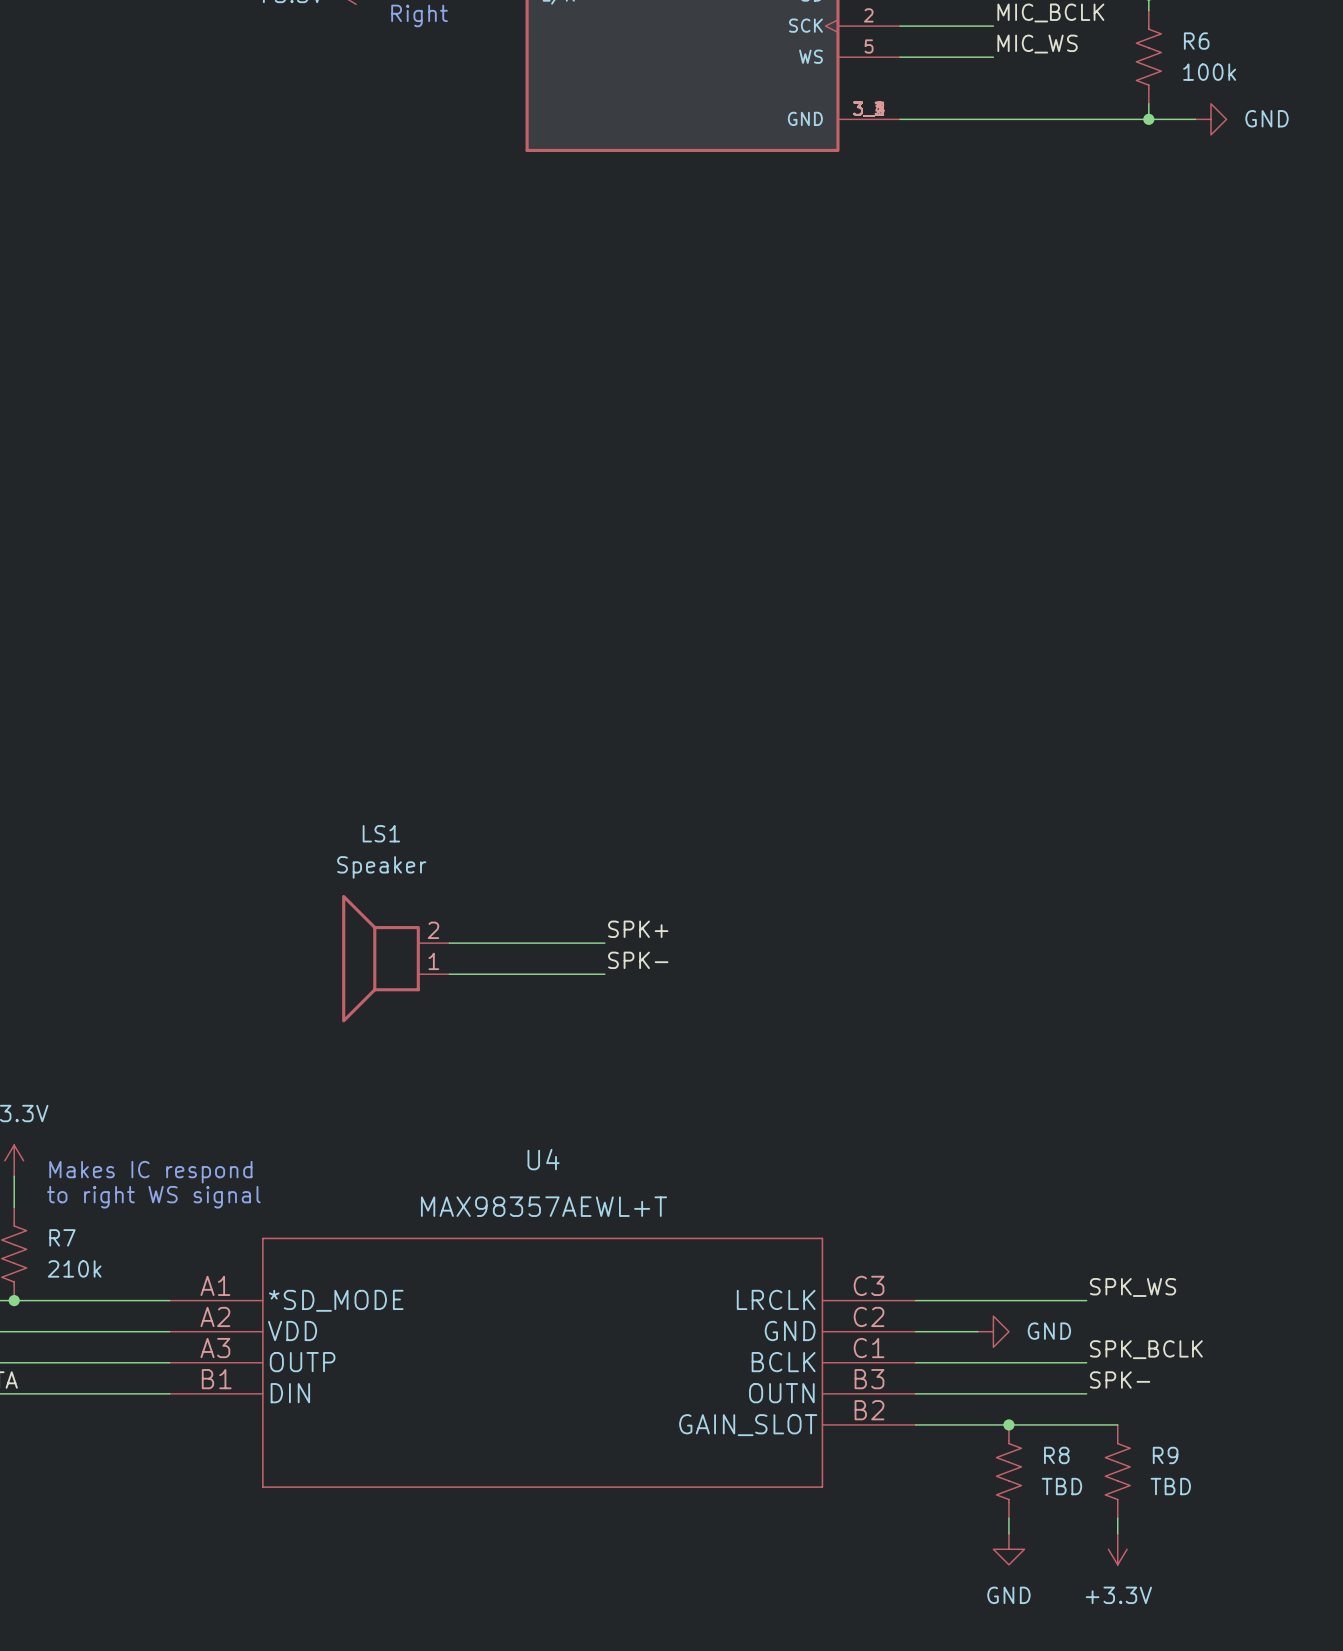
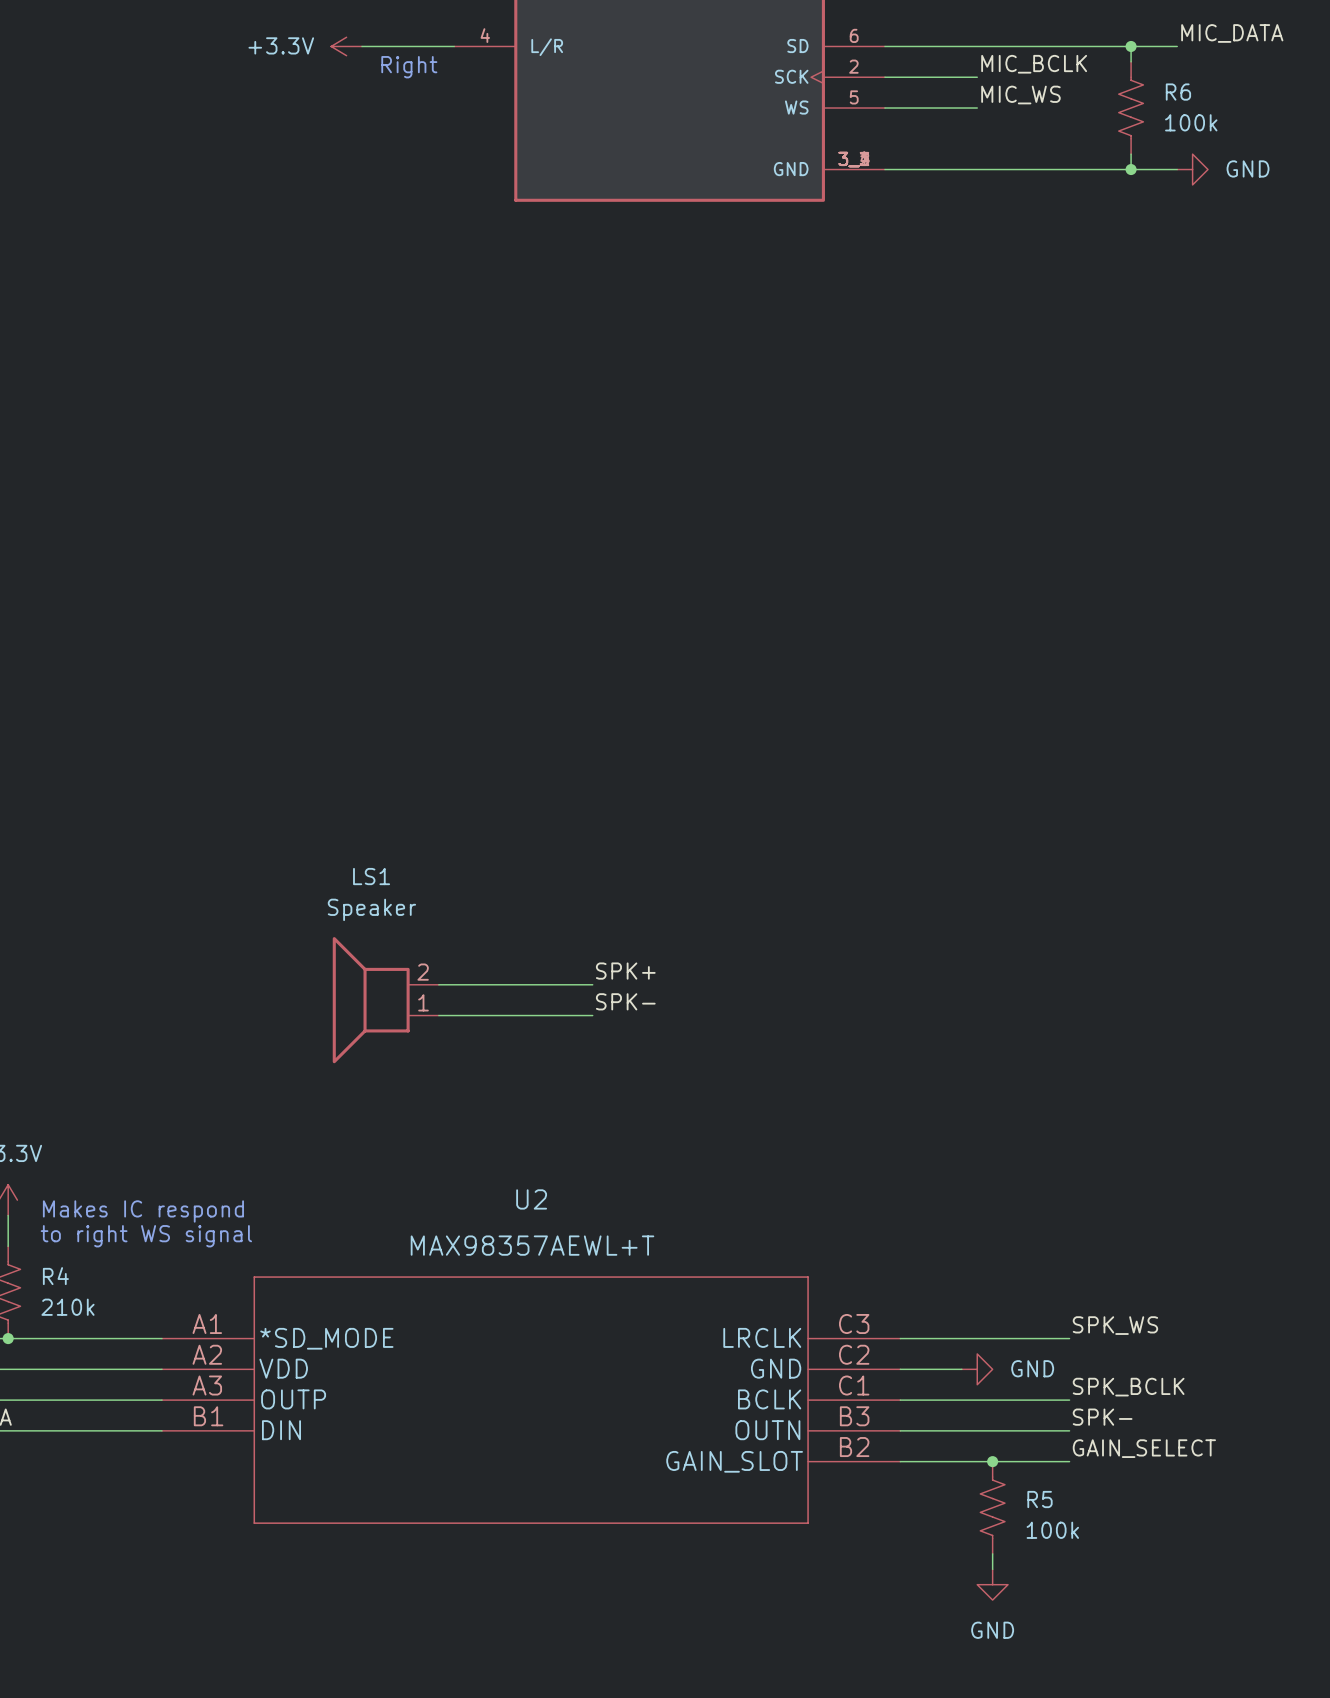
U4 name: U4 (543, 1159) -> U2 (531, 1199)
R7 name: R7 (62, 1237) -> R4 (55, 1276)
label: none -> GAIN_SELECT (1144, 1448)
wire: (1086, 1424) (1117, 1424) -> none
R8 name: R8 (1056, 1455) -> R5 (1039, 1499)
R9: TBD (1117, 1471) -> none
R8 value: TBD (1061, 1486) -> 100k (1052, 1530)
wire: (1117, 1518) (1117, 1533) -> none
power symbol: +3.3V (1117, 1549) -> none

